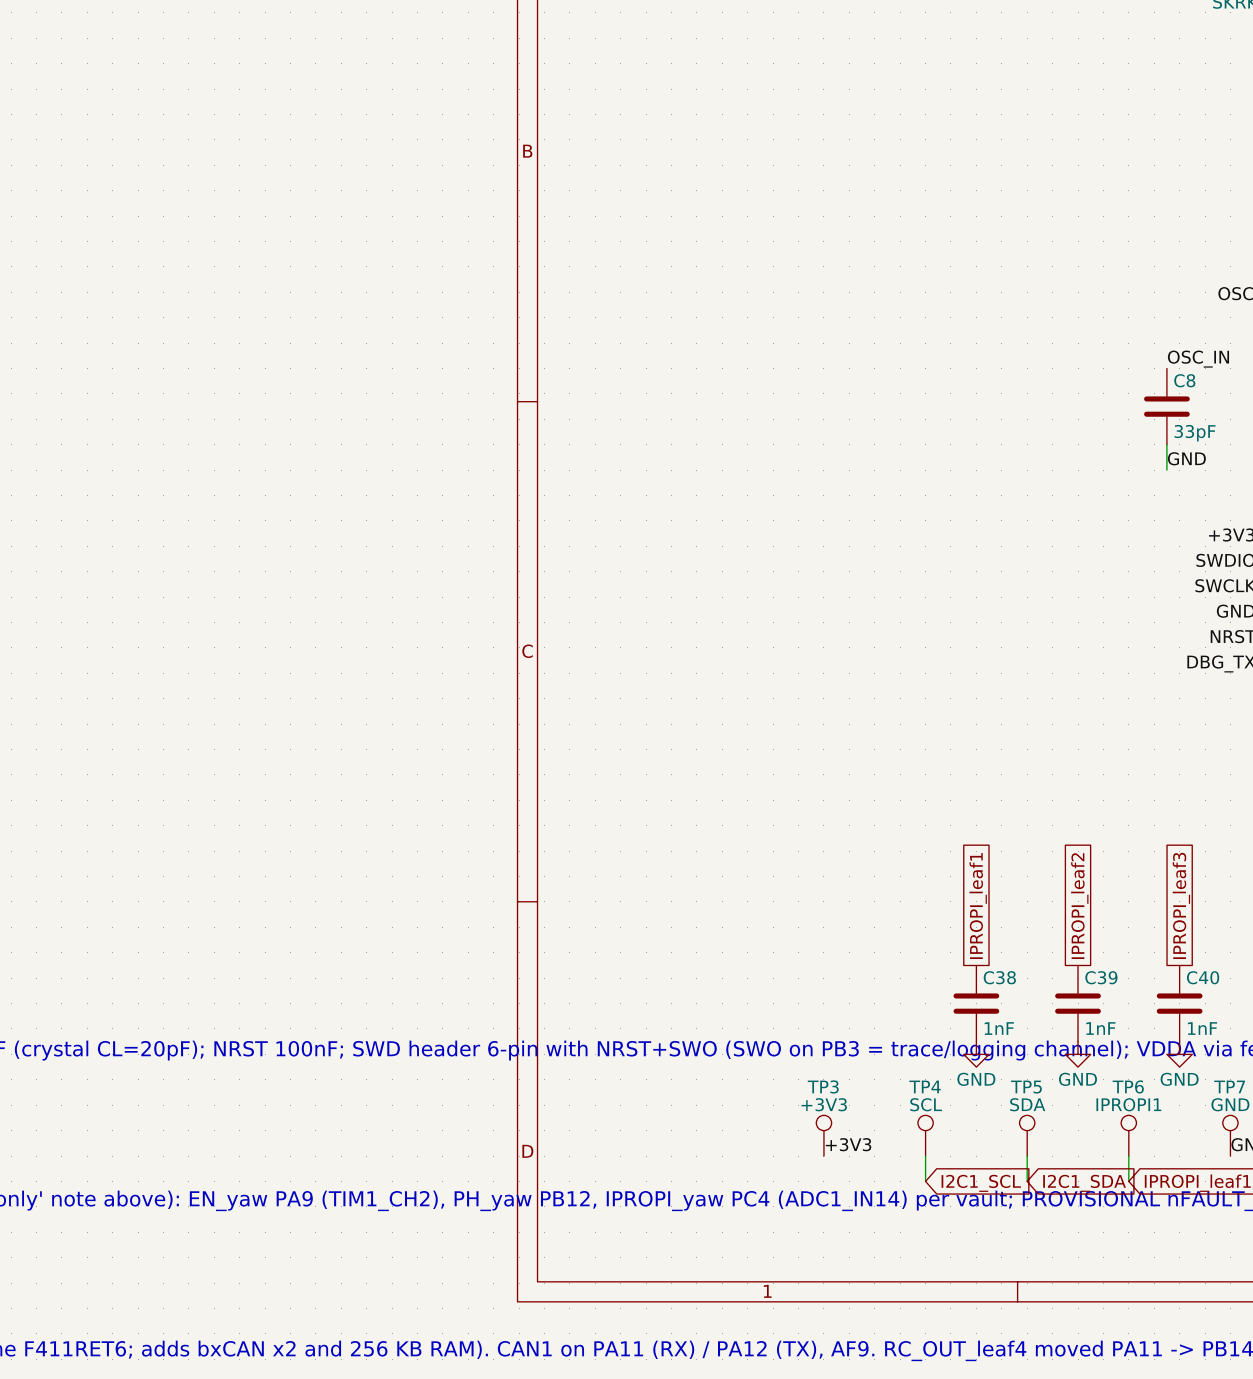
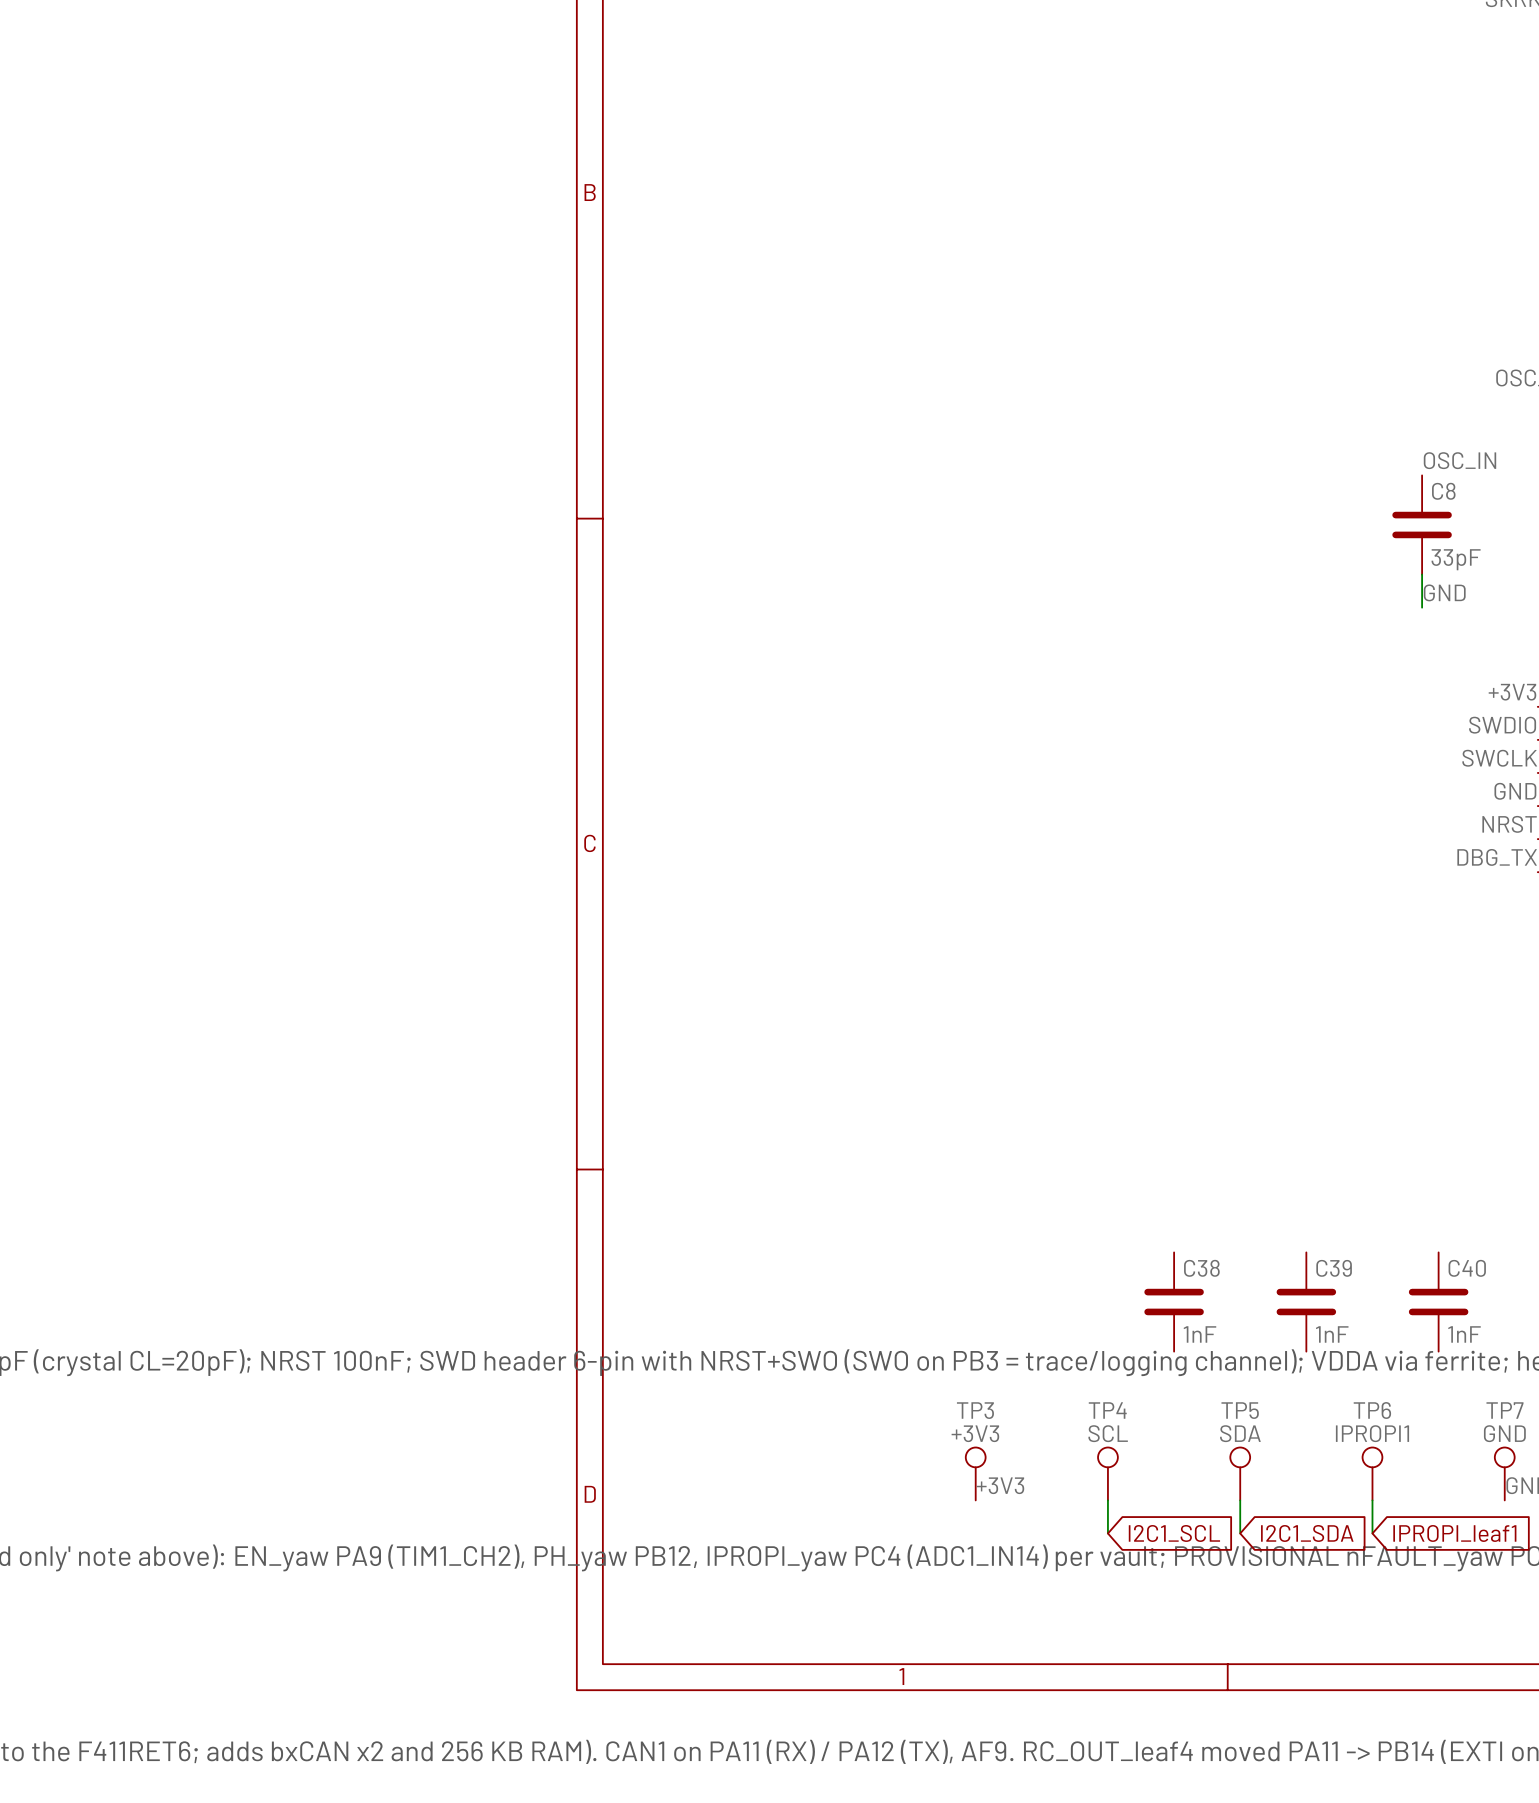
global label: IPROPI_leaf3 (1181, 905) -> none
global label: IPROPI_leaf1 (978, 906) -> none
global label: IPROPI_leaf2 (1079, 906) -> none
power symbol: GND (976, 1054) -> none
power symbol: GND (1078, 1054) -> none
power symbol: GND (1179, 1054) -> none

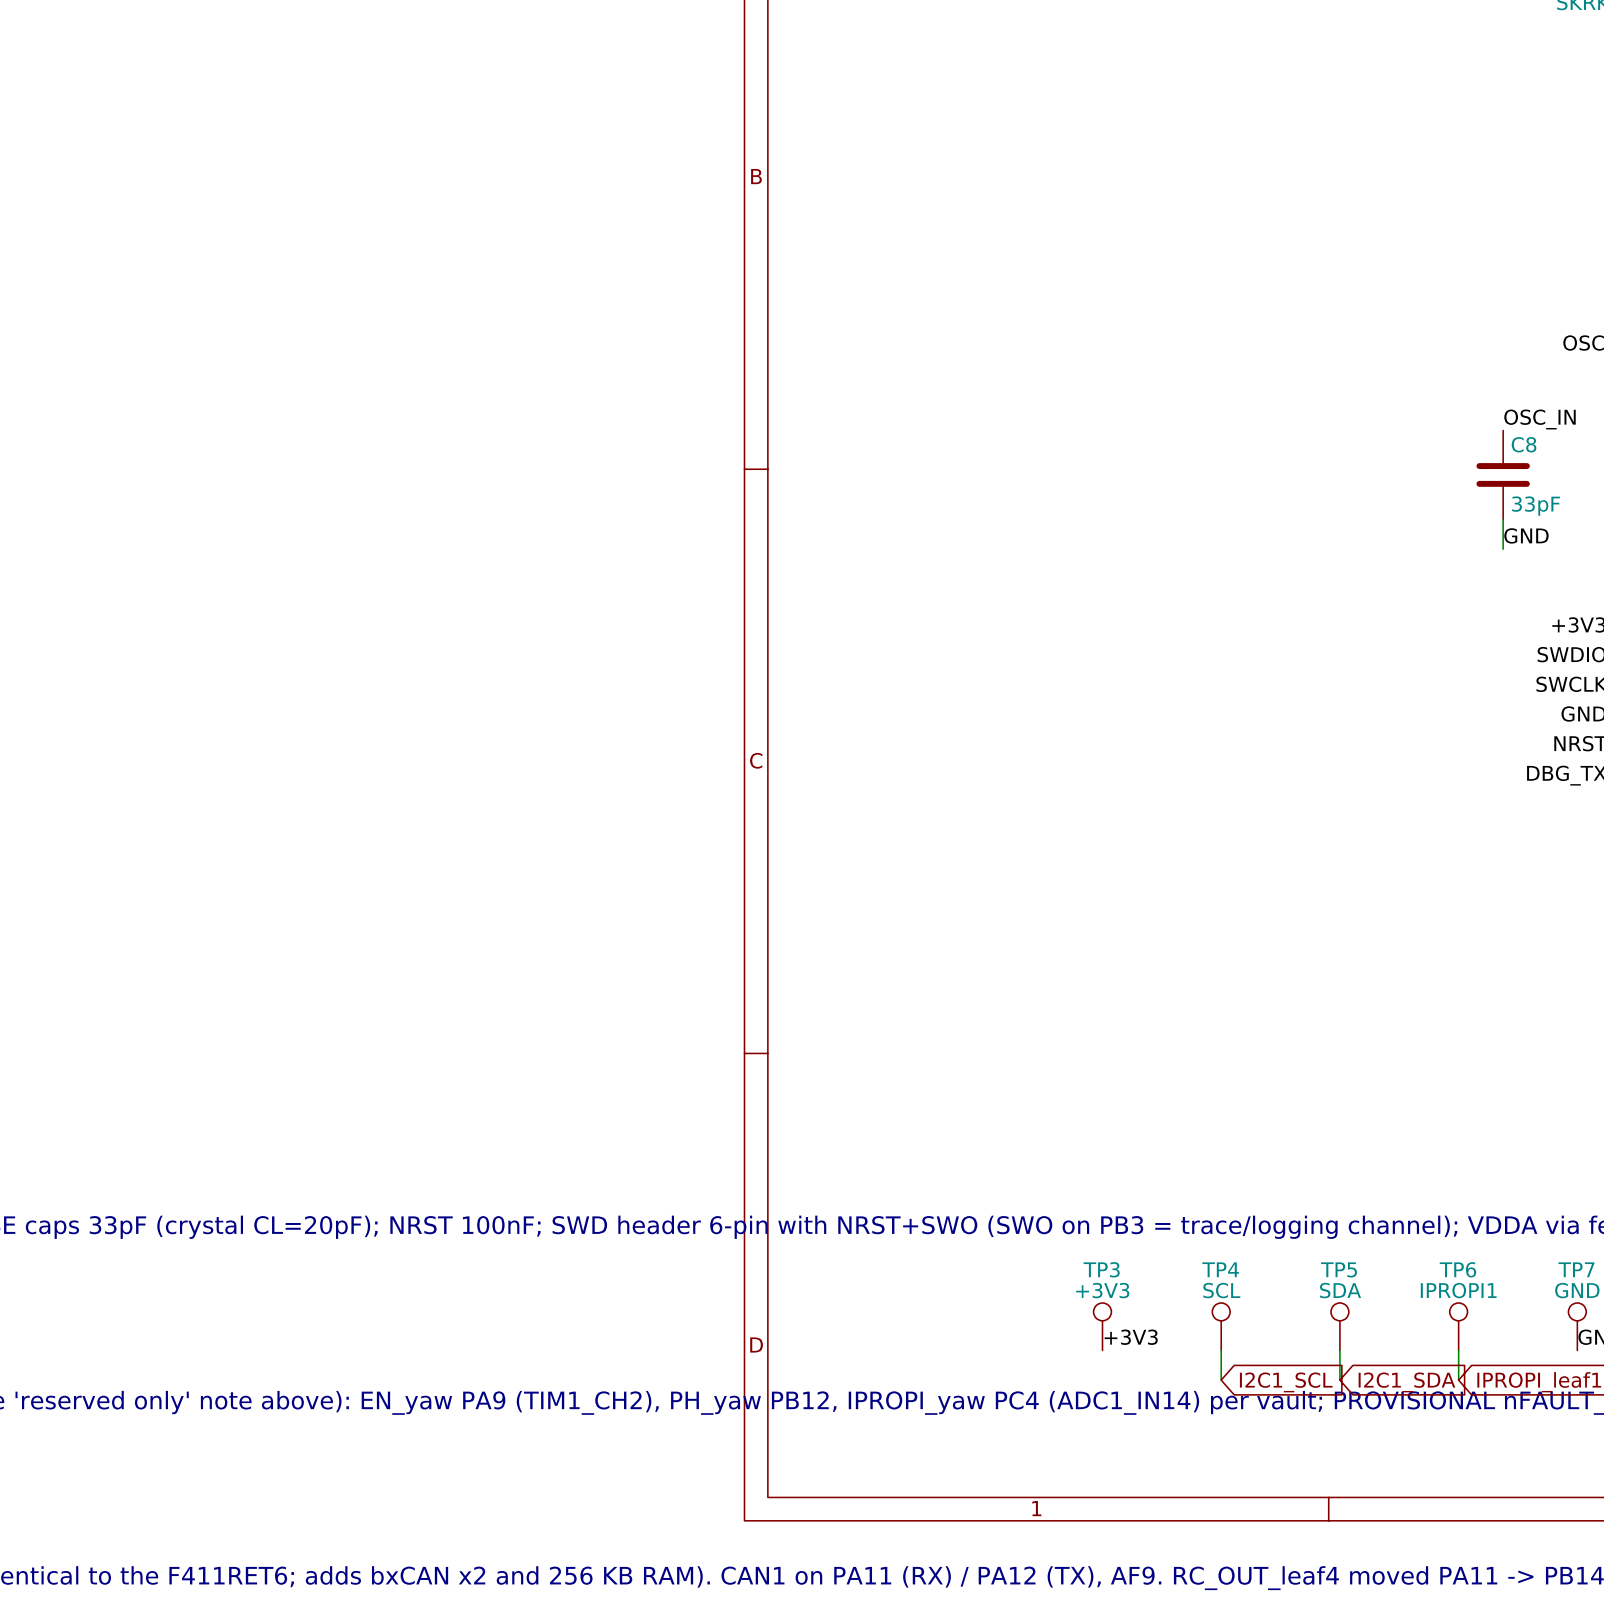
C38: 1nF (1174, 1302) -> none
C39: 1nF (1306, 1302) -> none
C40: 1nF (1438, 1302) -> none

